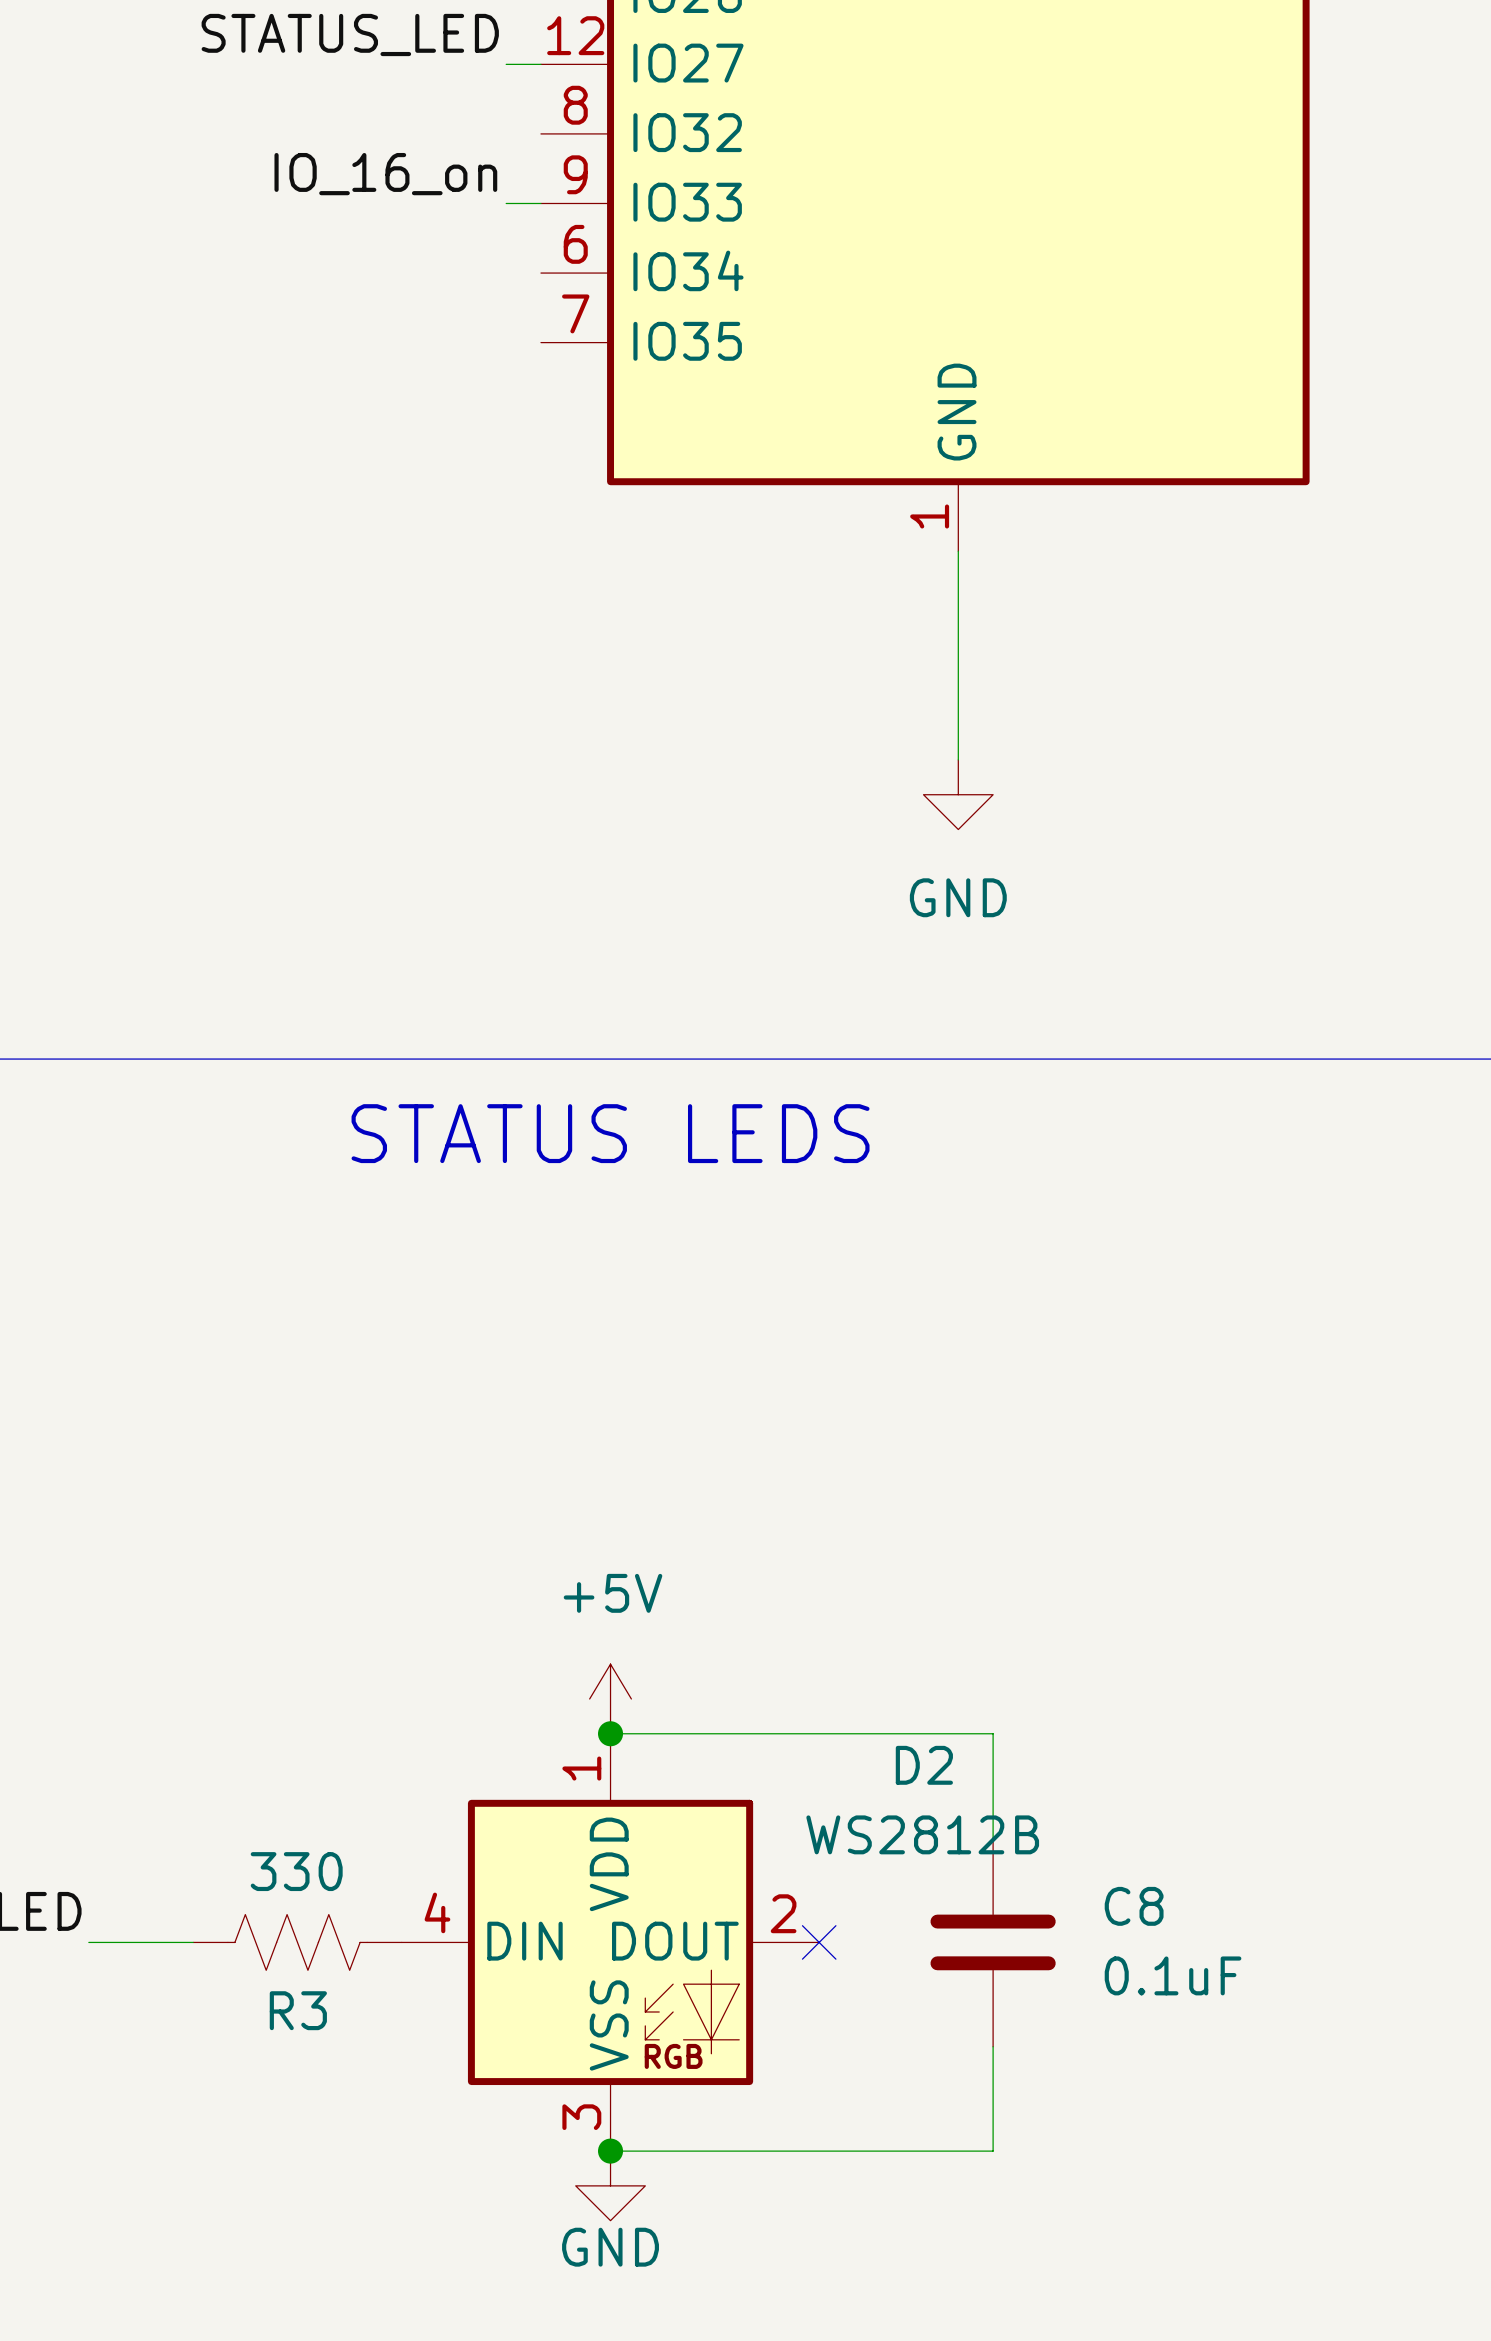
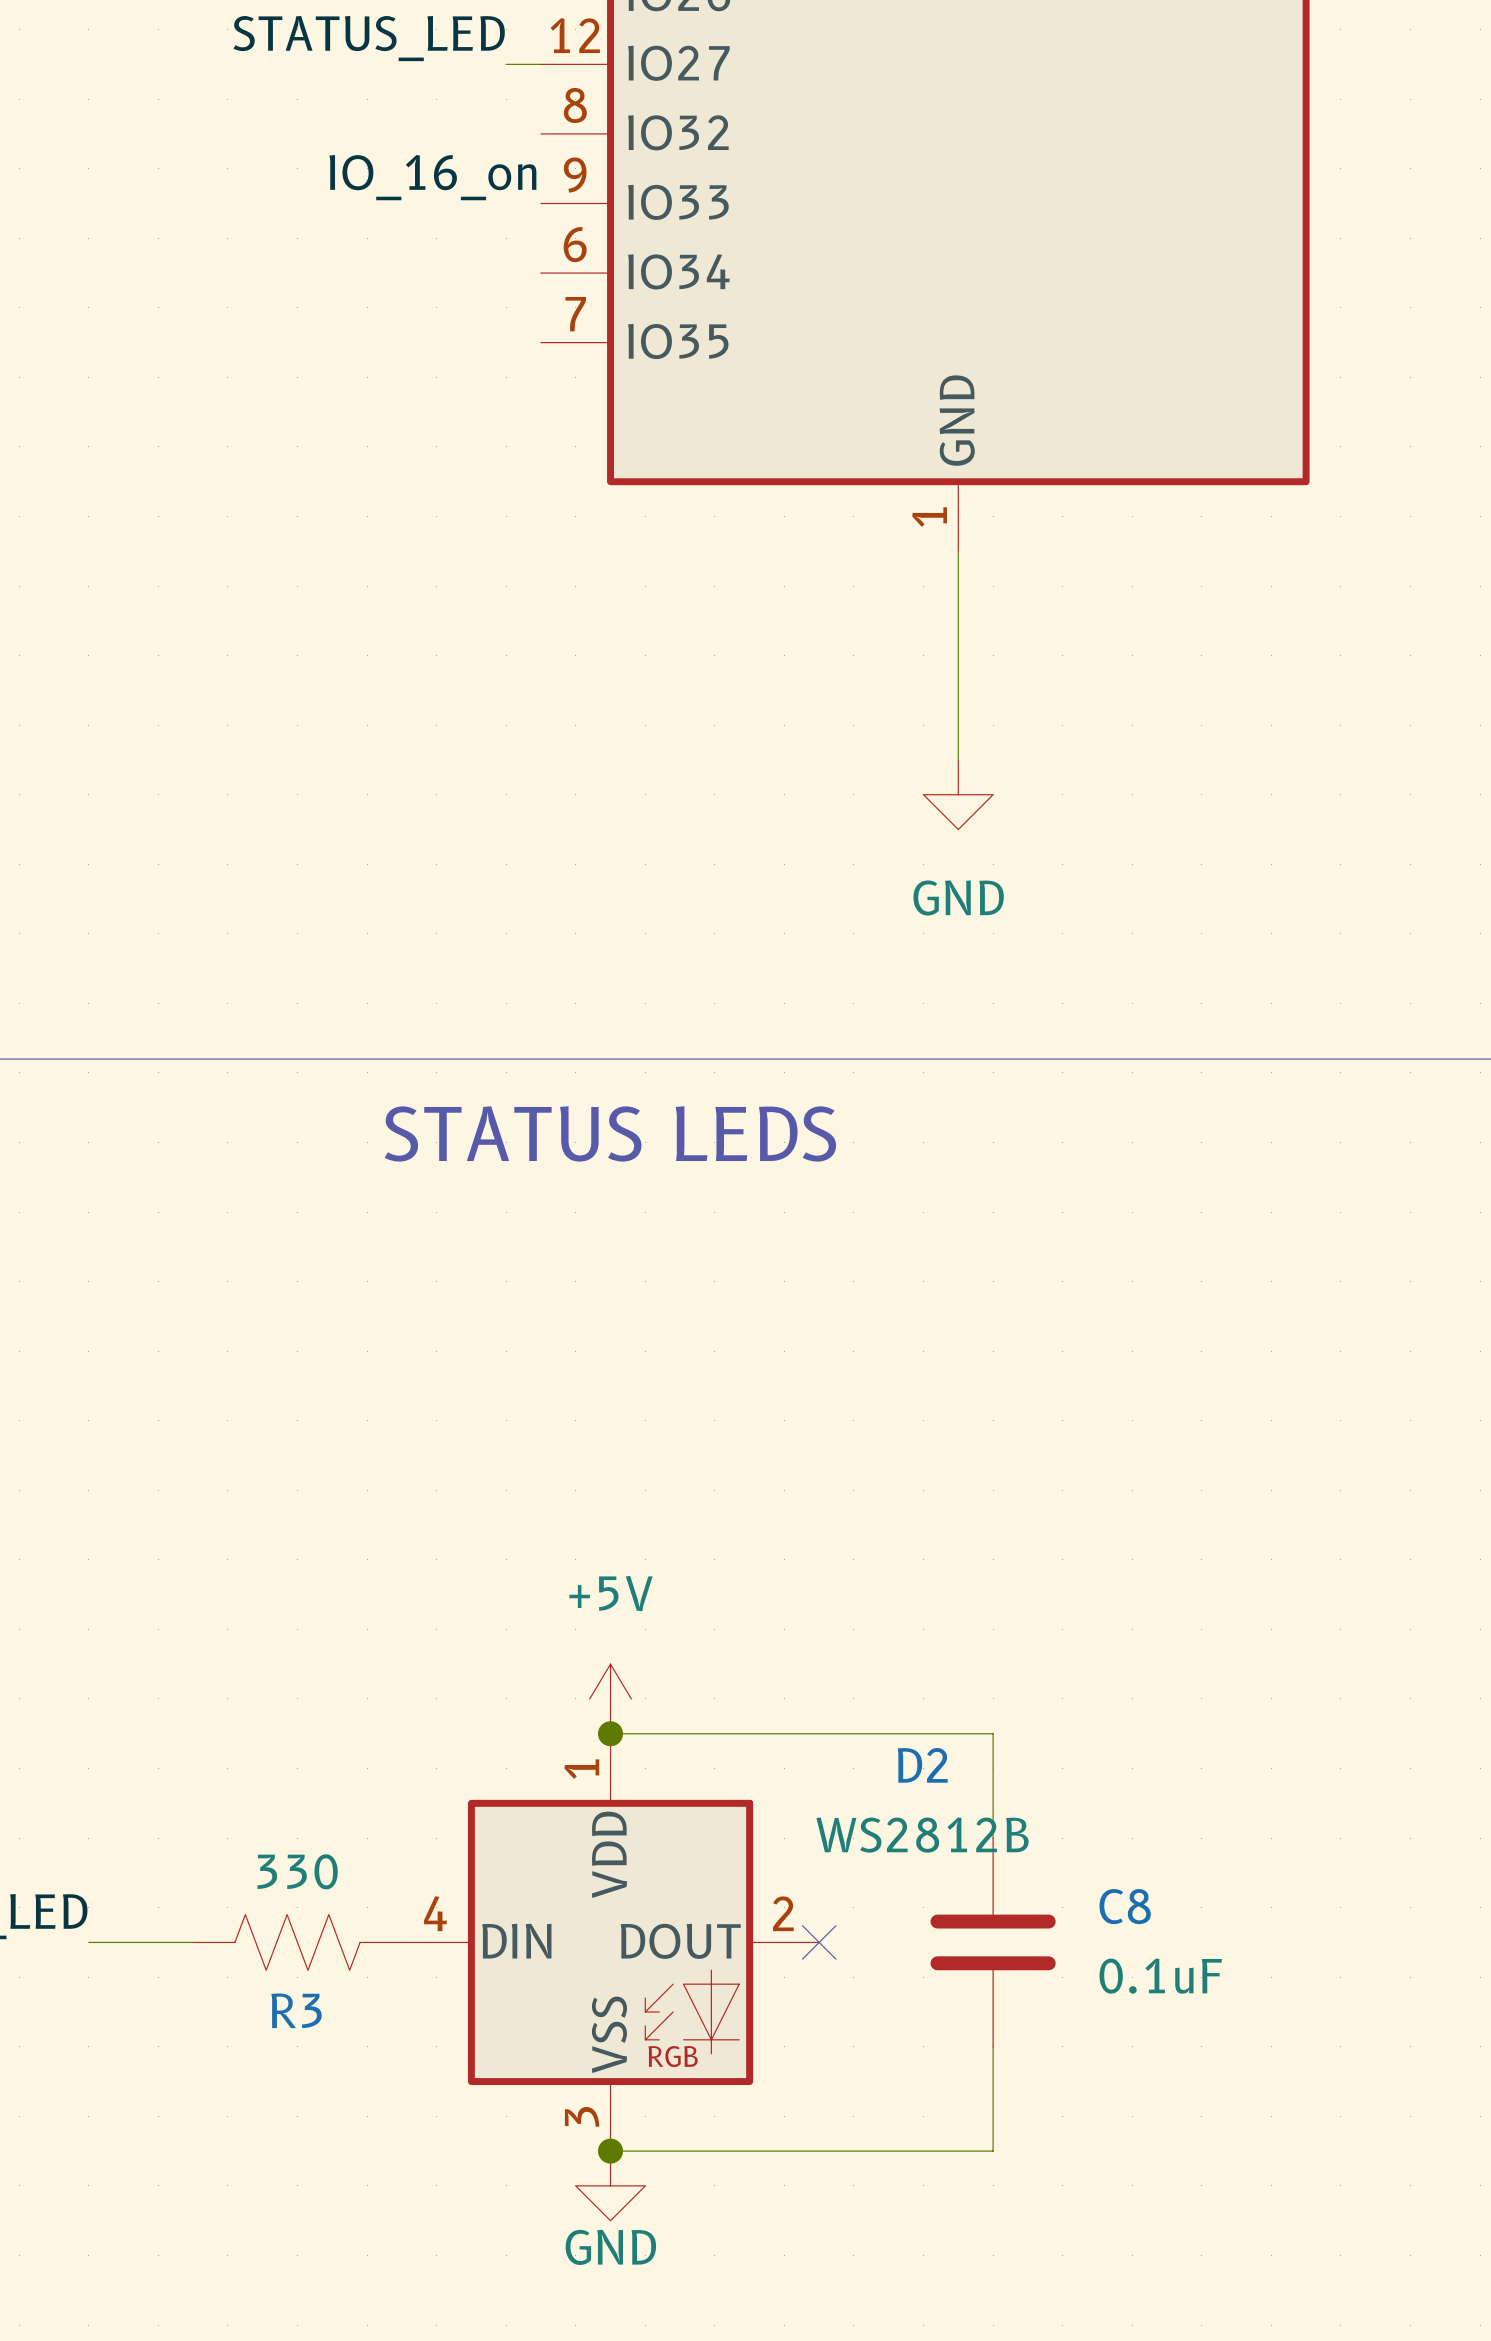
label position: IO_16_on (385, 174) -> IO_16_on (432, 177)
wire: (506, 203) (540, 203) -> none

